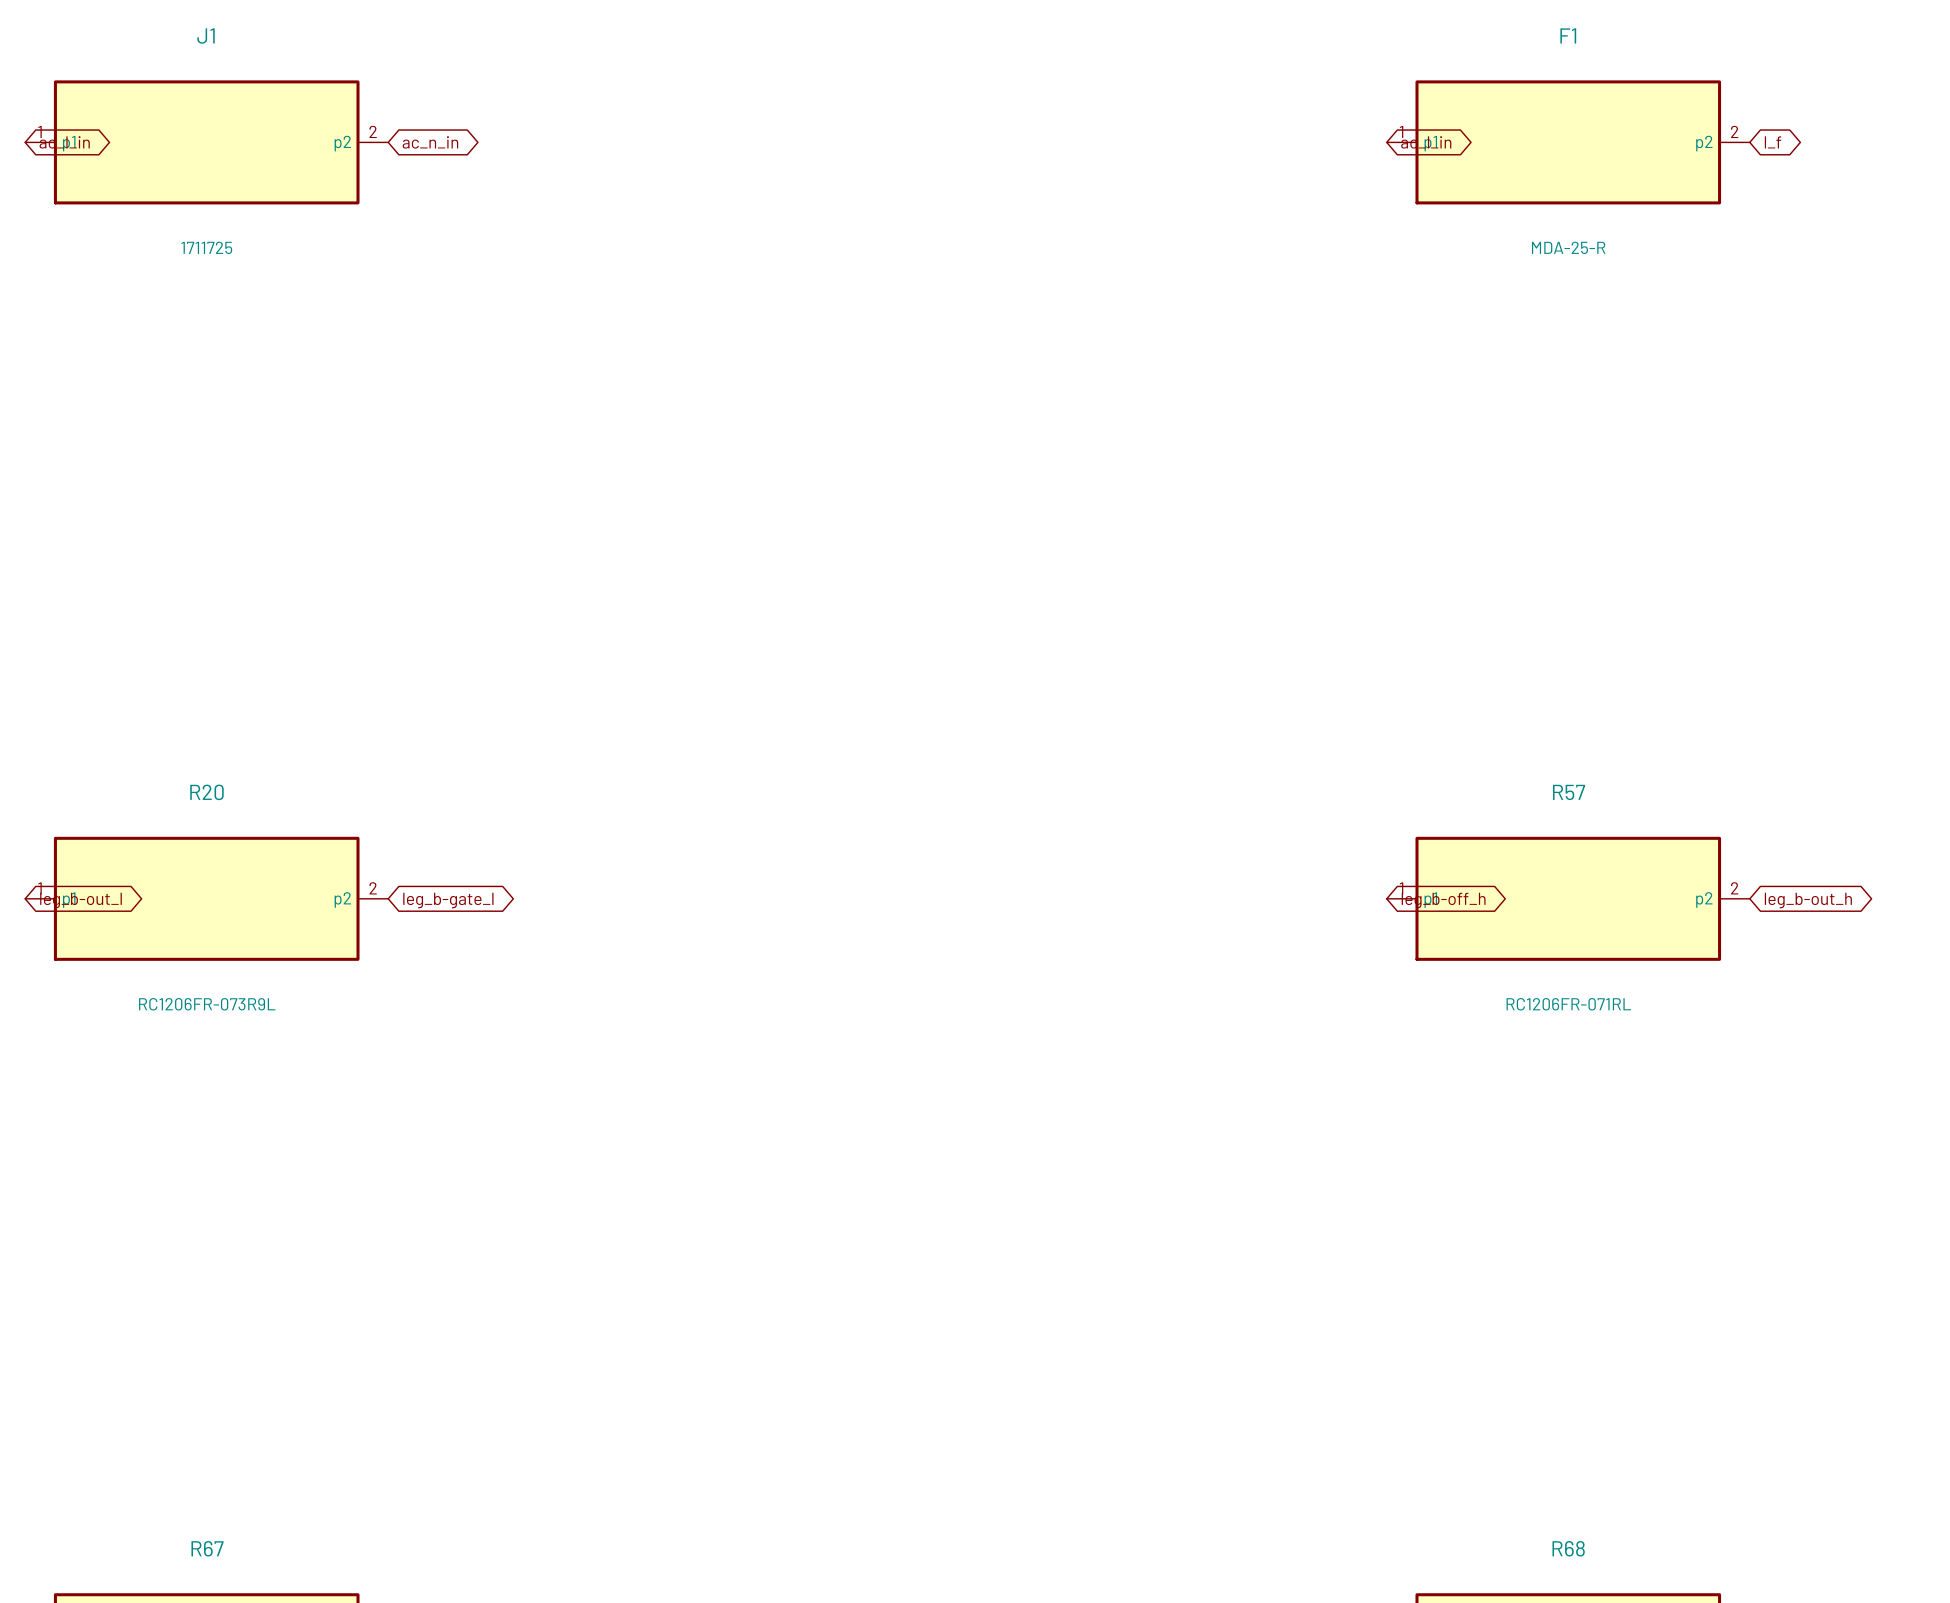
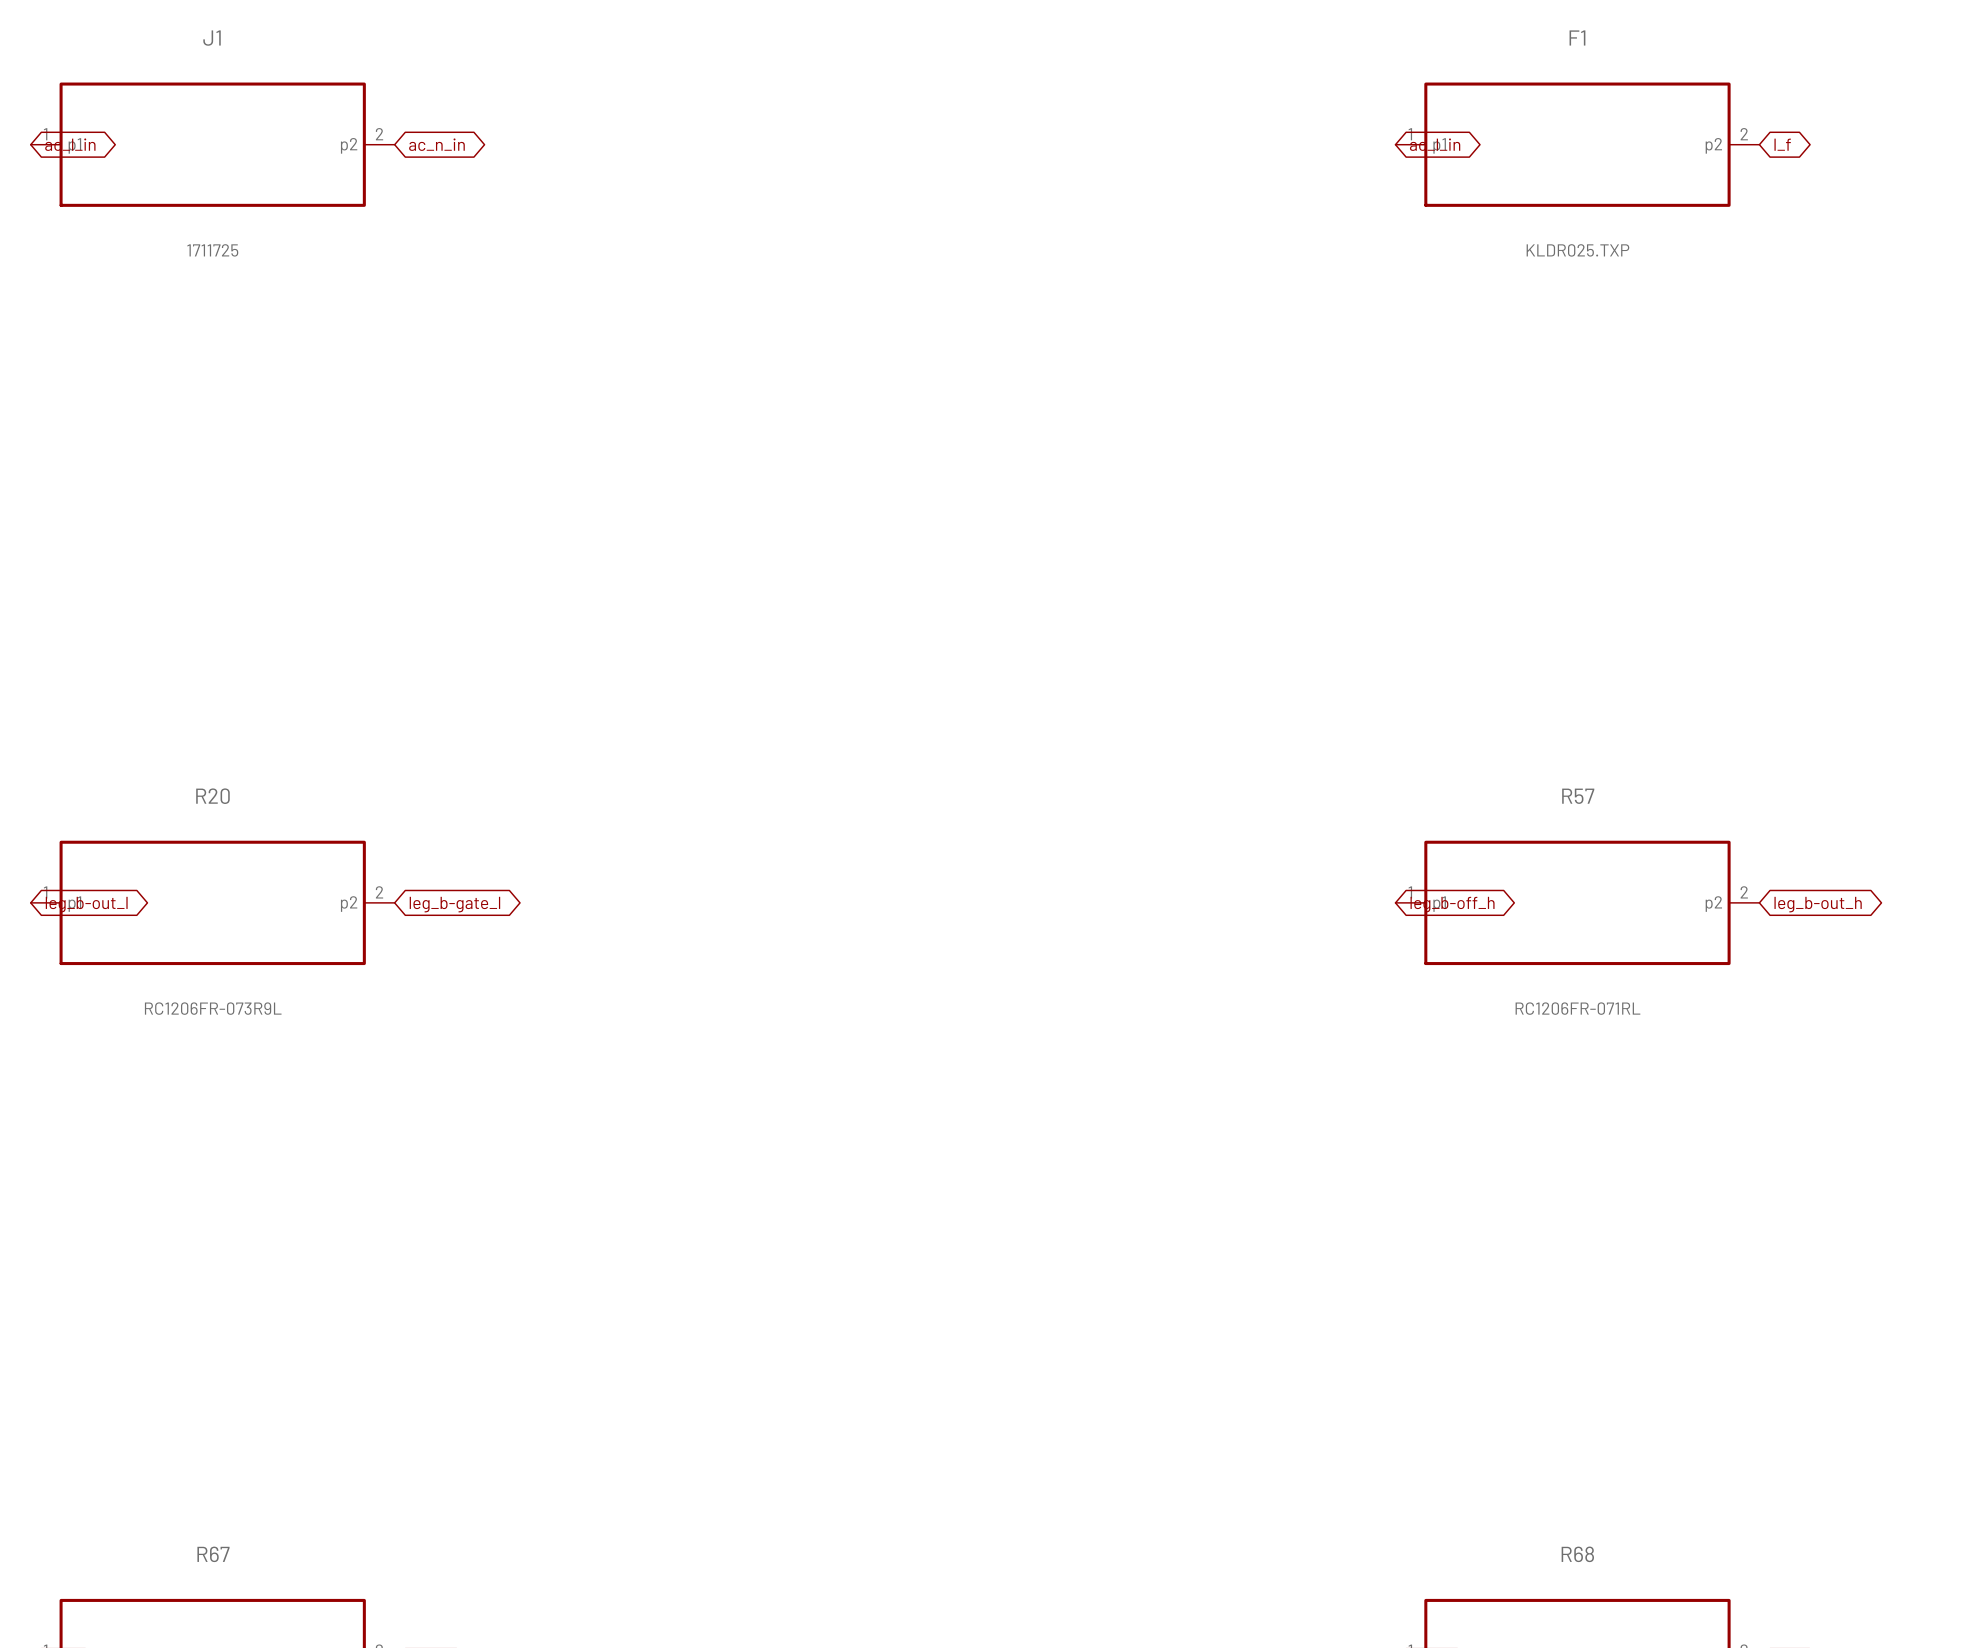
F1 value: MDA-25-R (1568, 247) -> KLDR025.TXP (1577, 250)

